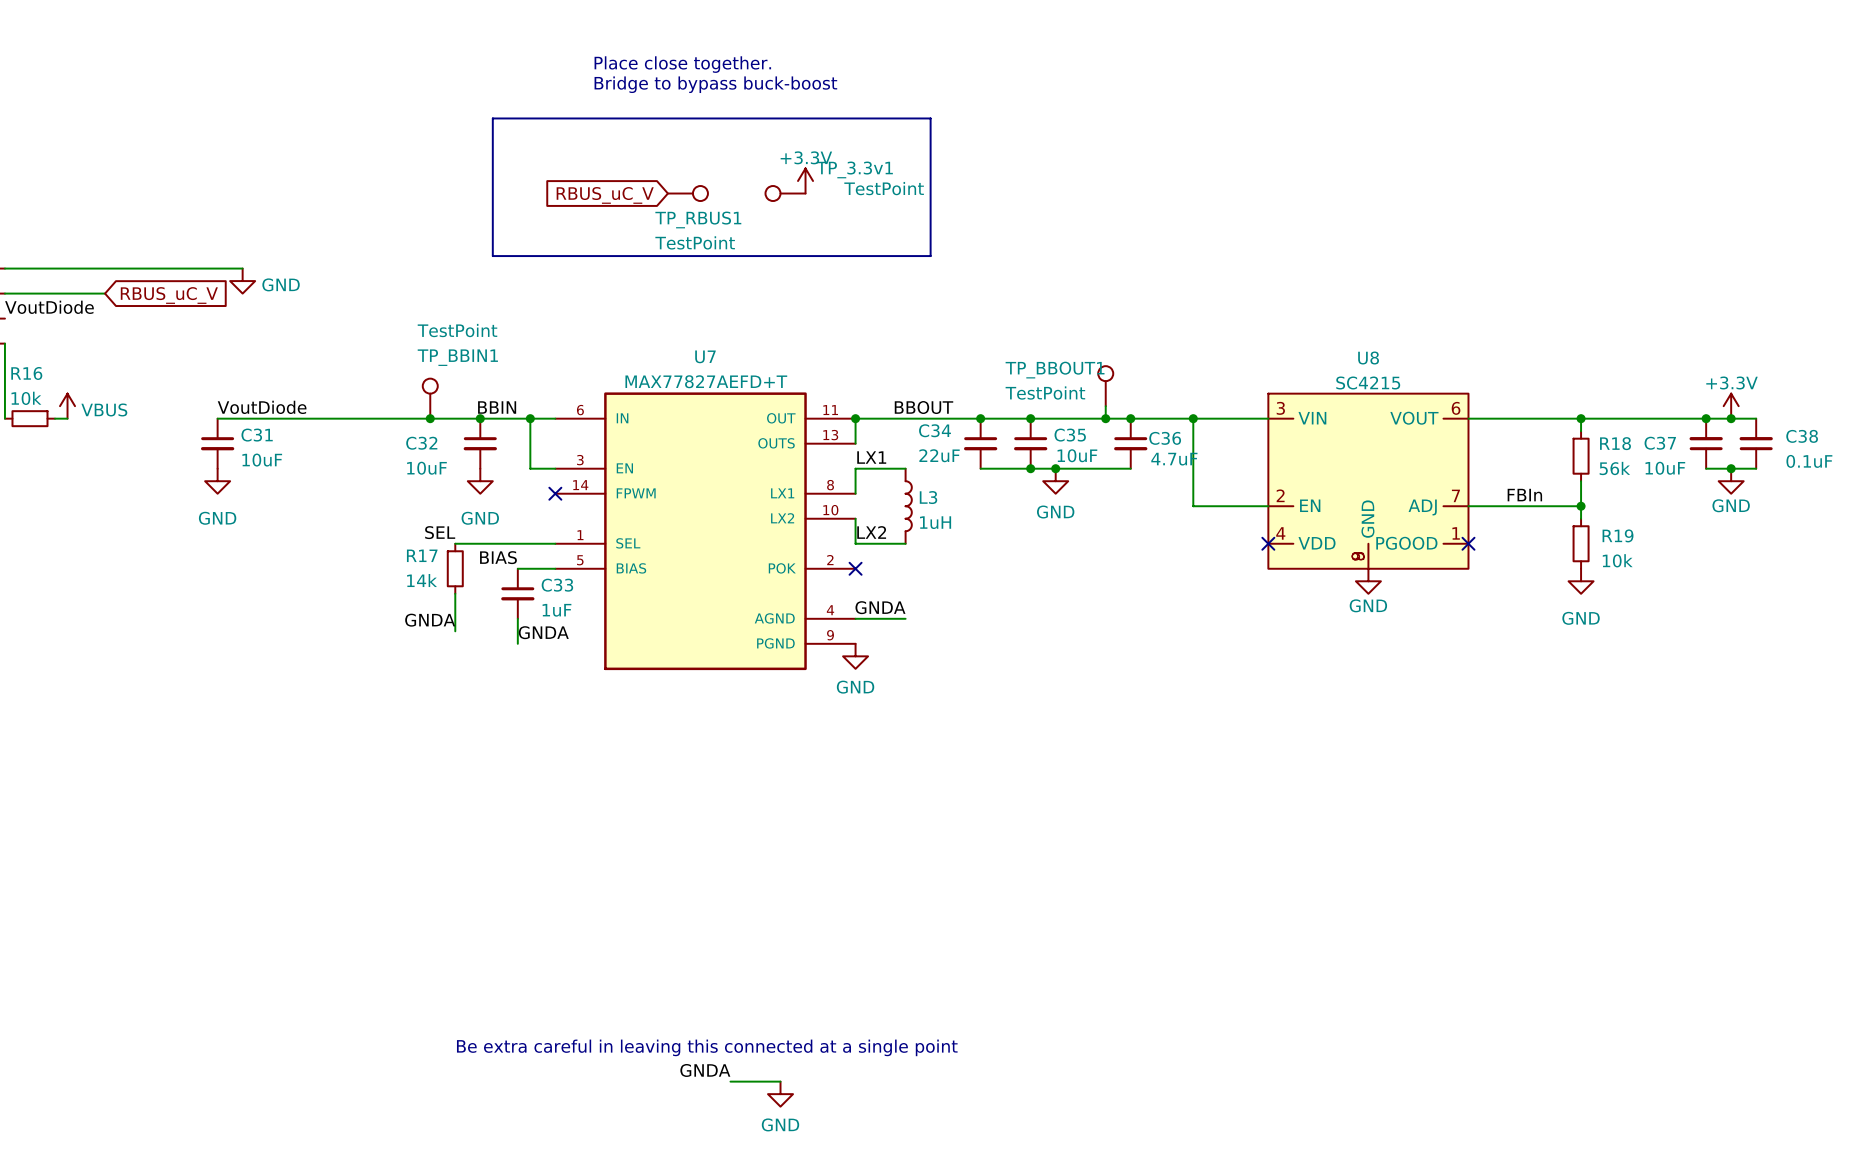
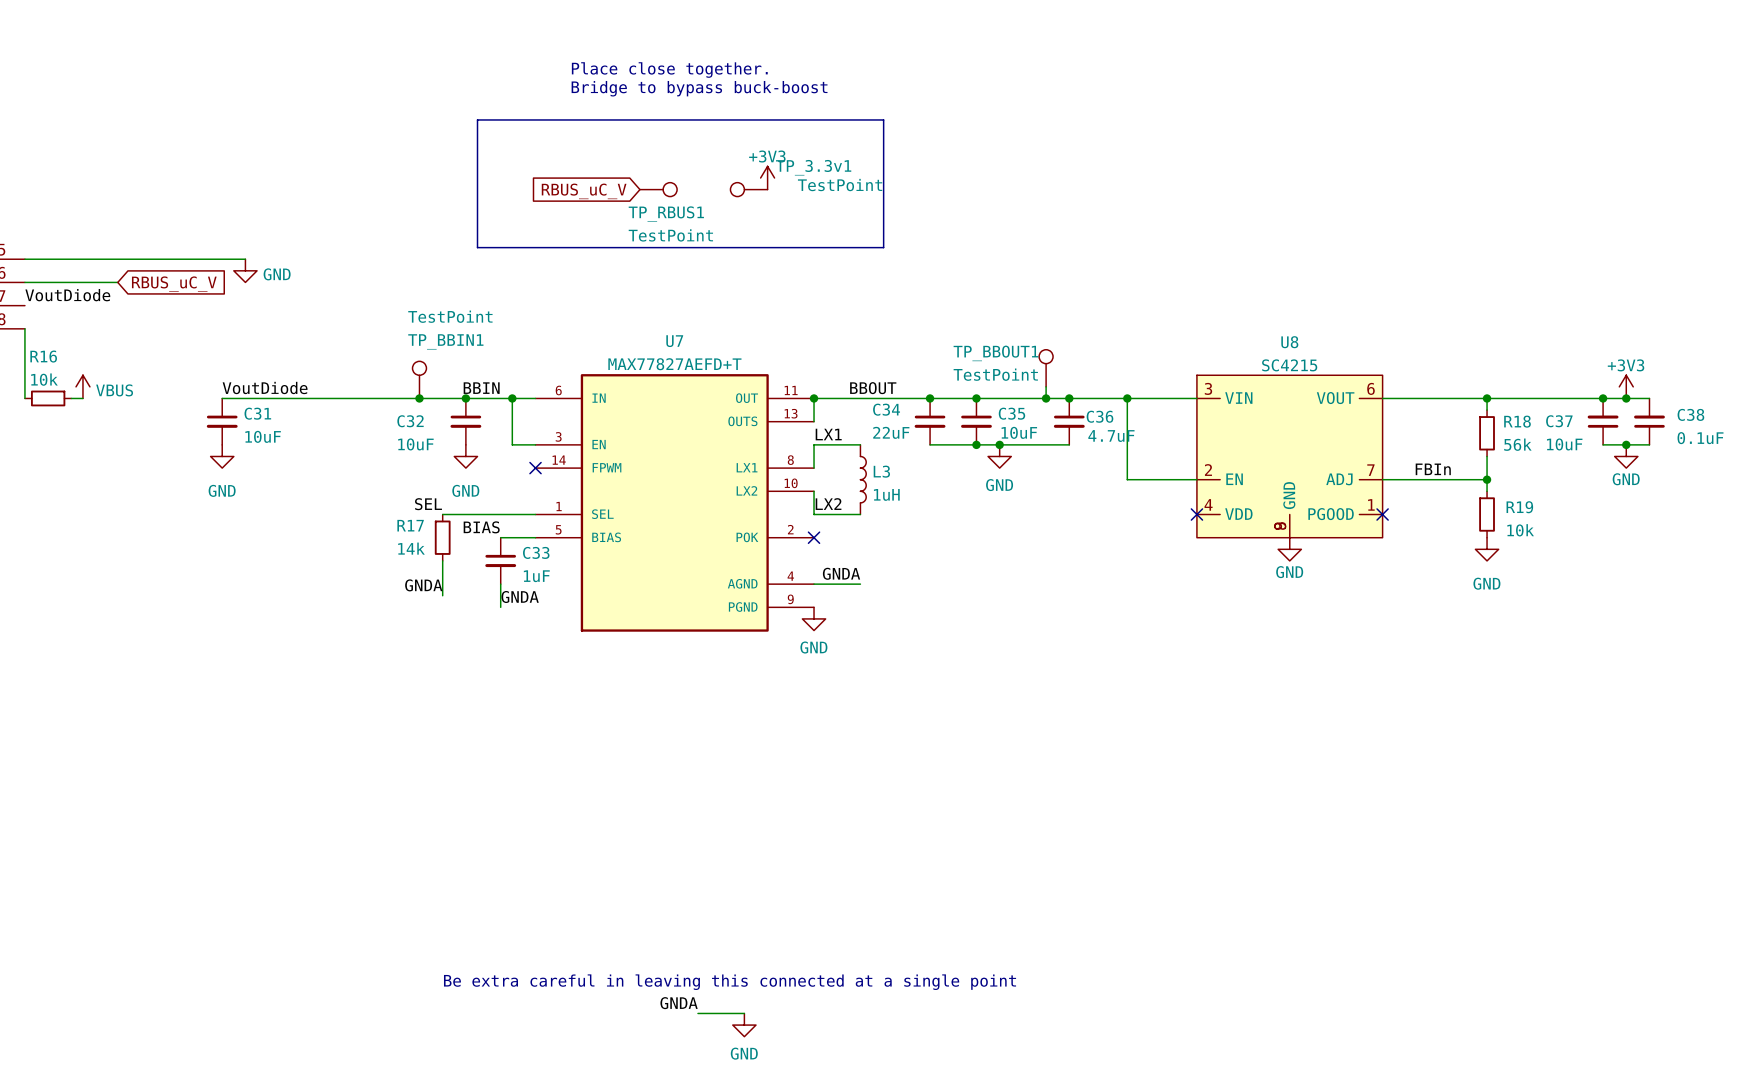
power symbol: +3.3V (805, 181) -> +3V3 (767, 178)
power symbol: +3.3V (1731, 406) -> +3V3 (1626, 386)

